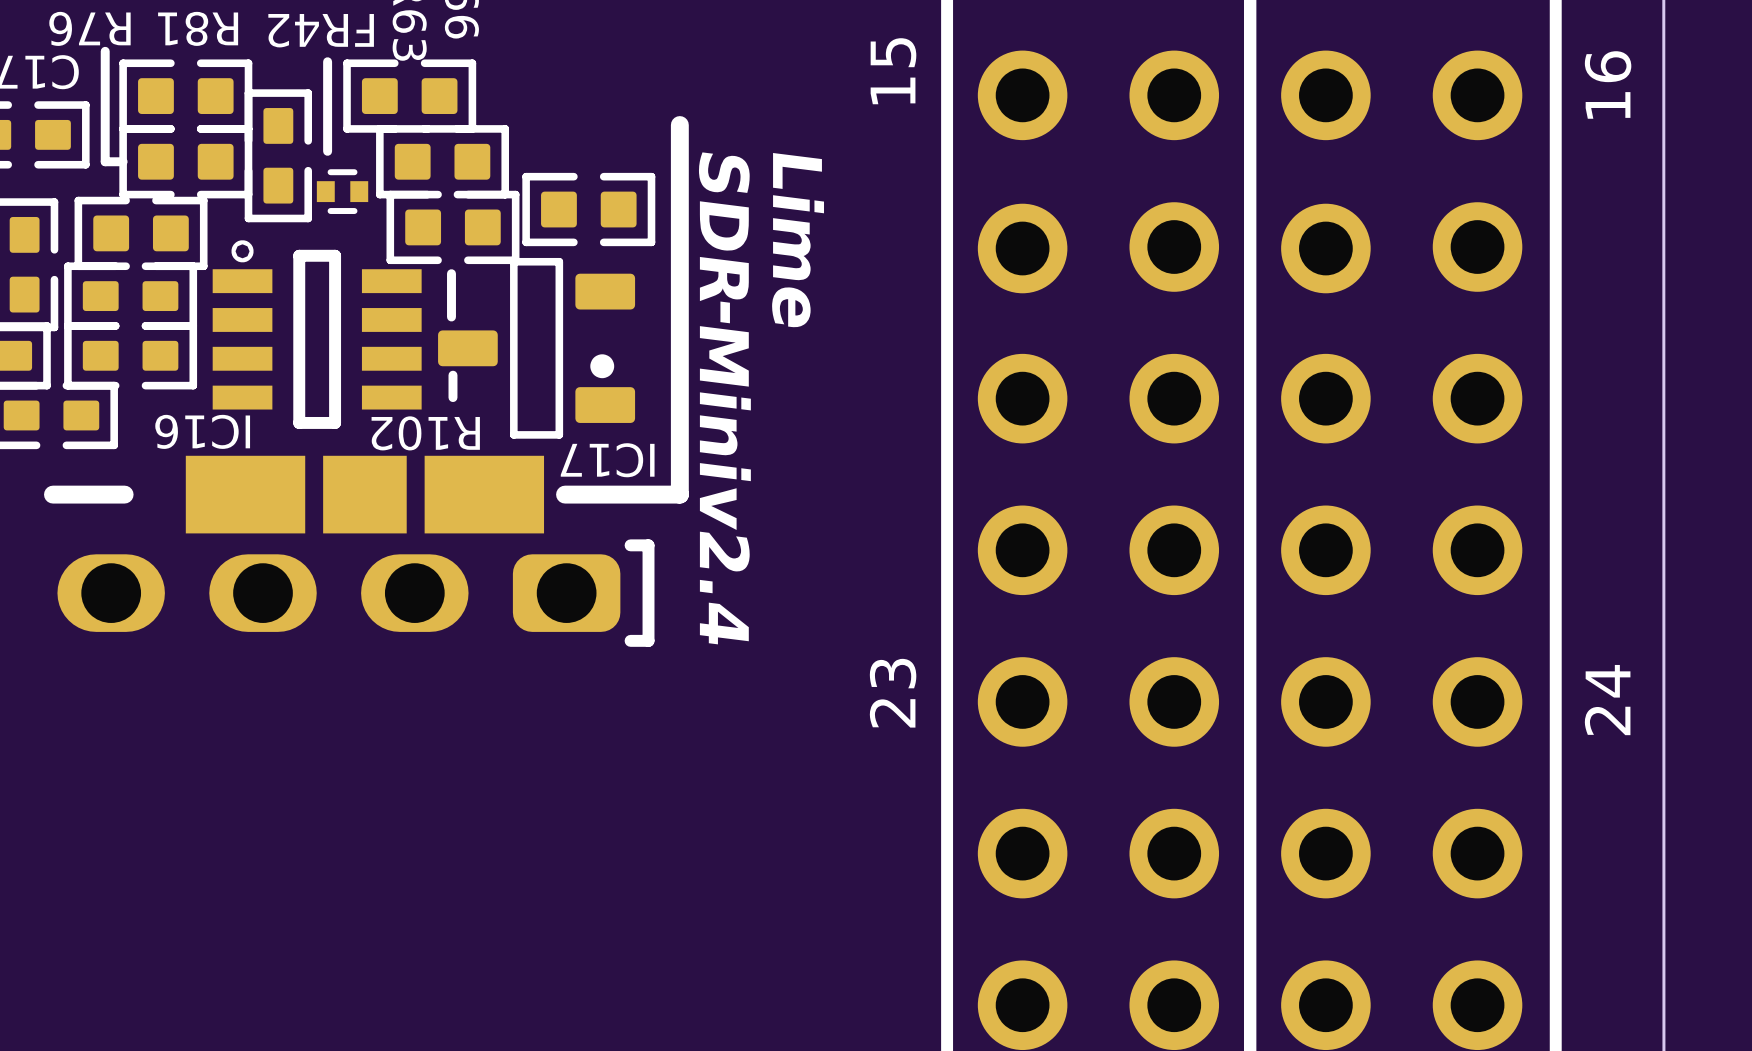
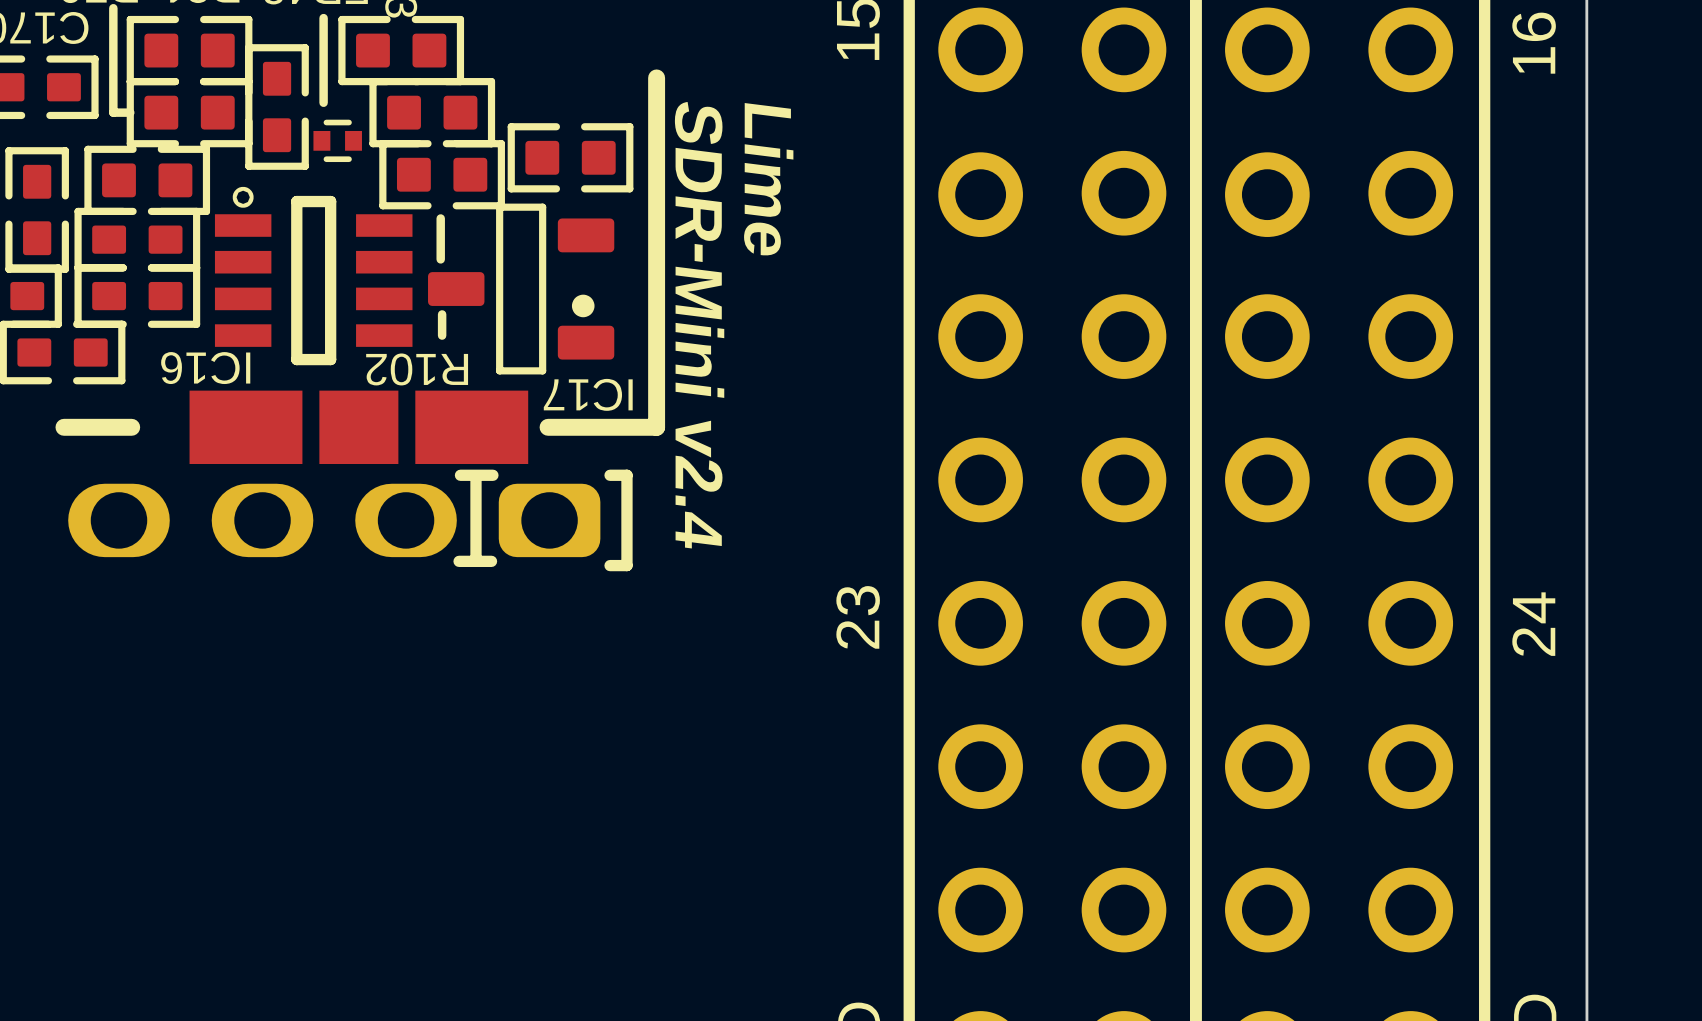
line: none -> (460, 475) (492, 475)
line: none -> (475, 478) (475, 561)
line: none -> (459, 561) (491, 561)

